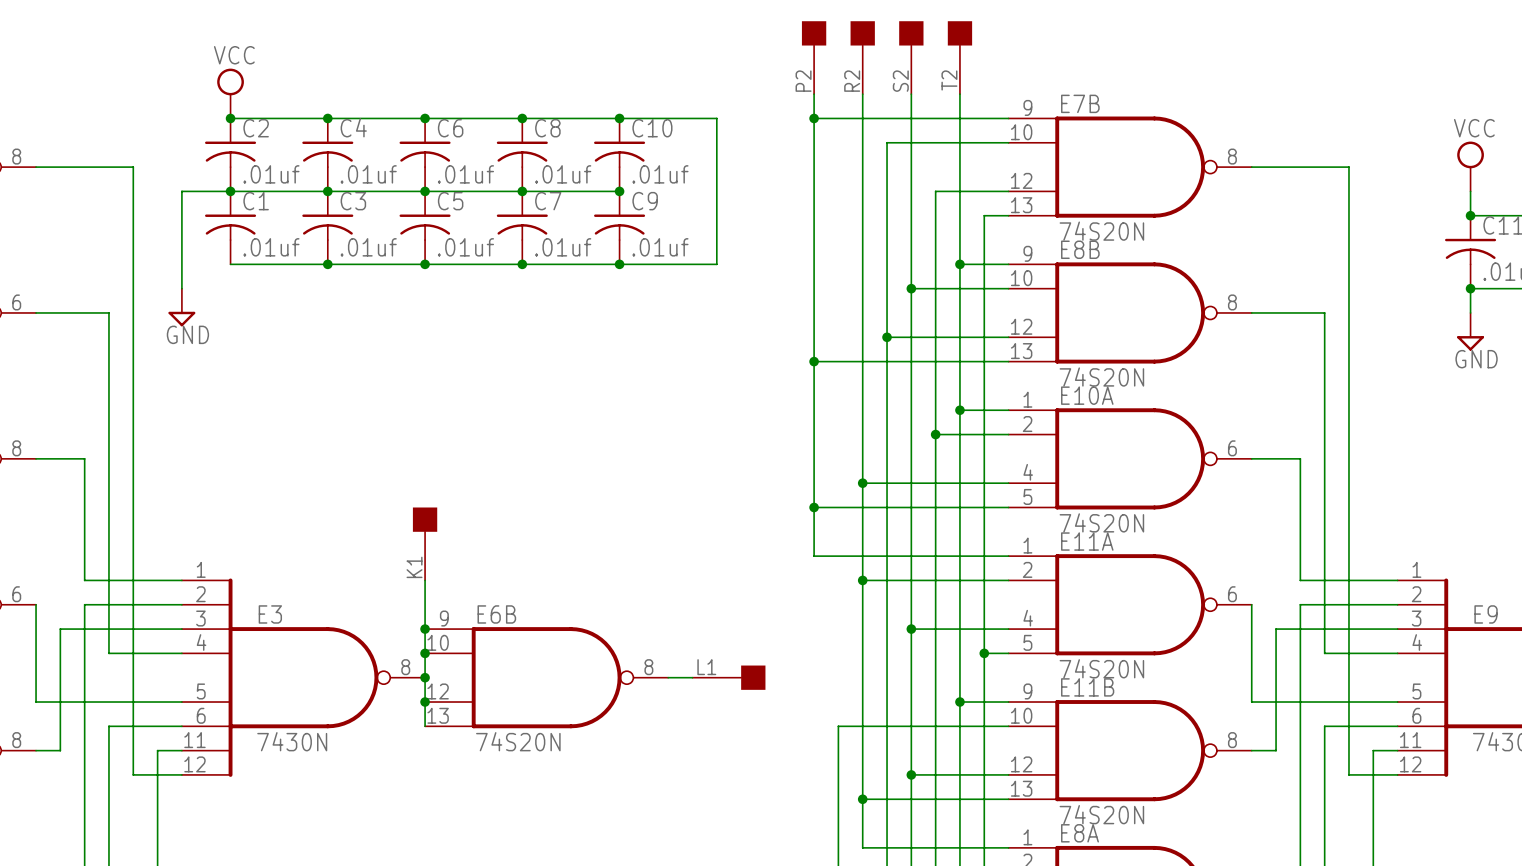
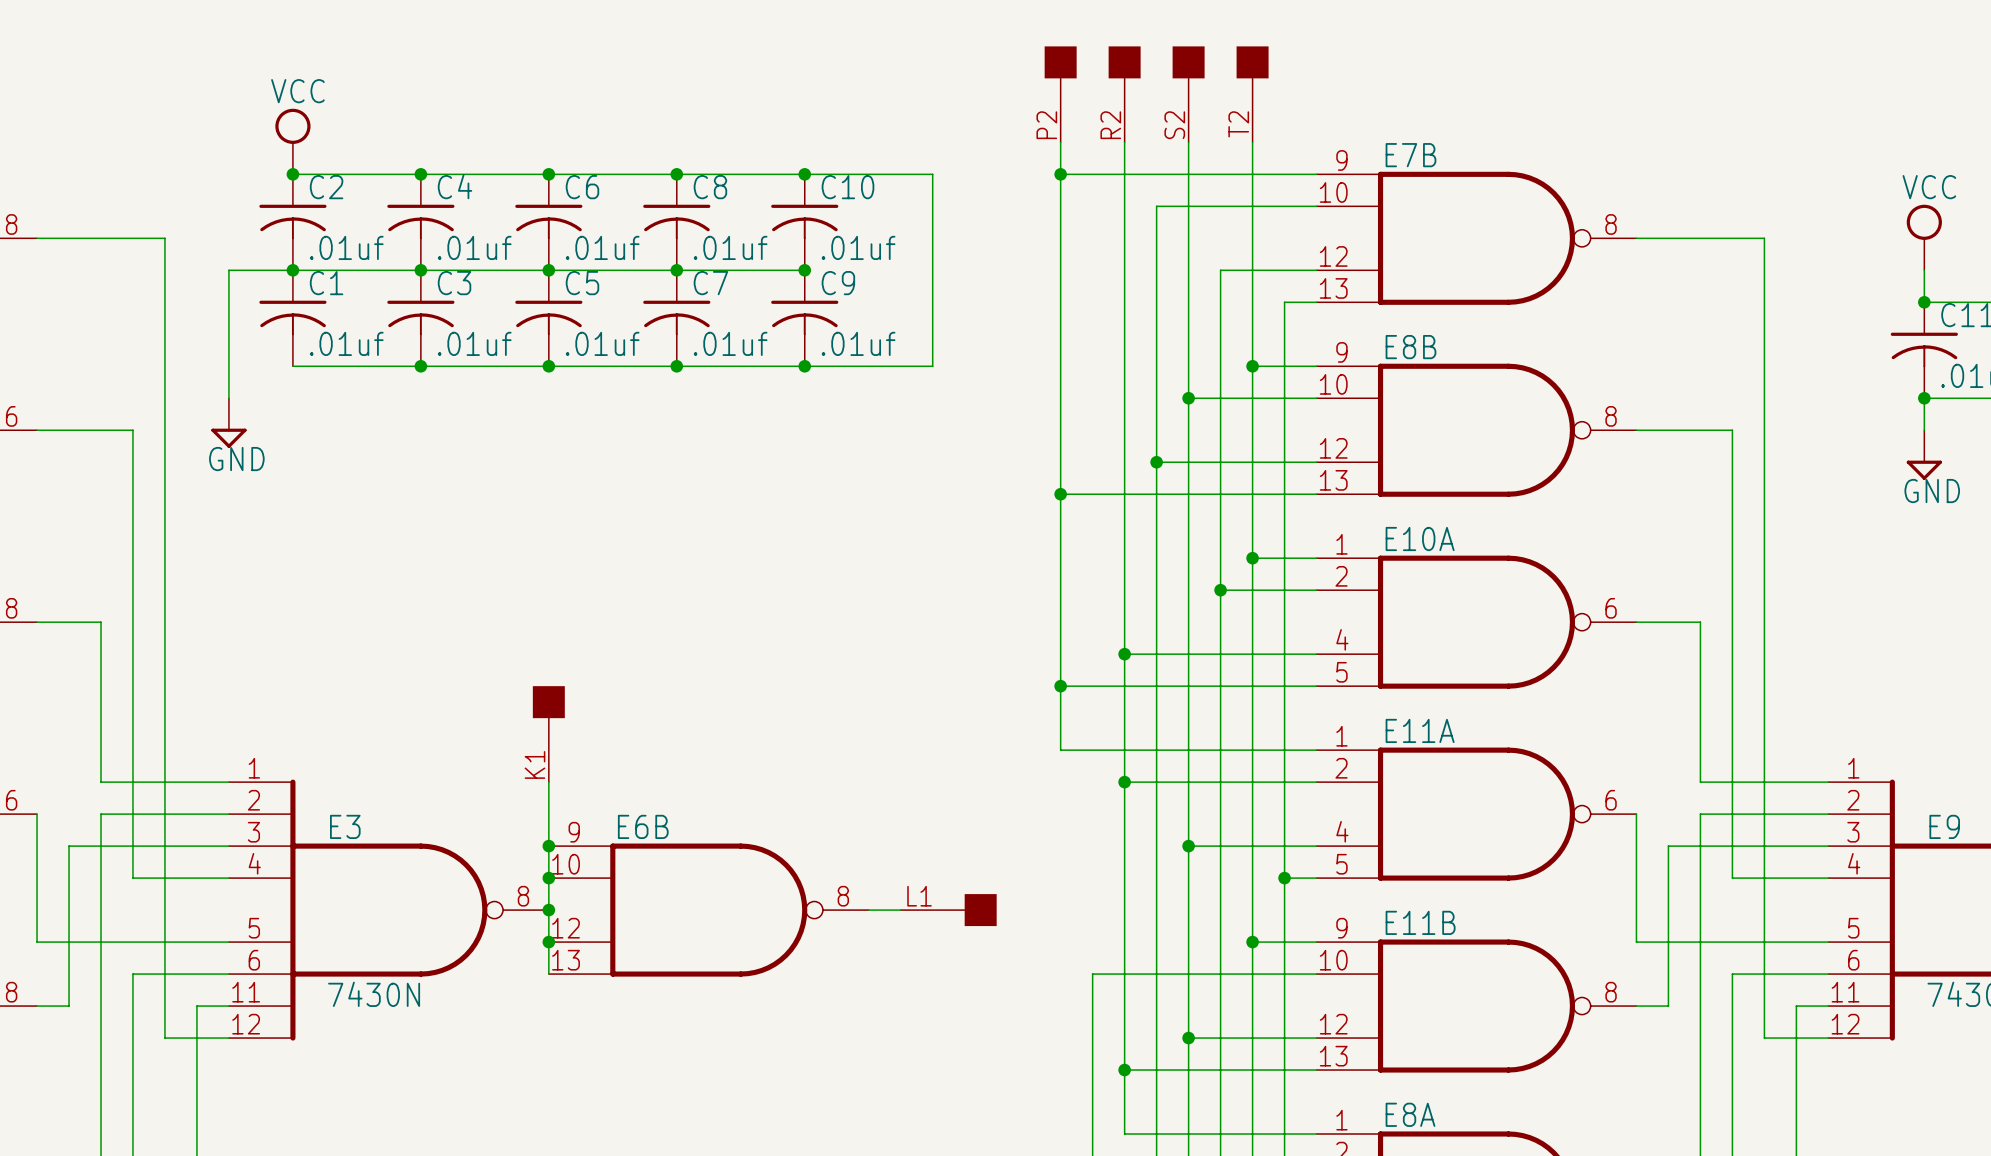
E7B value: 74S20N (1101, 231) -> none
E8B value: 74S20N (1101, 377) -> none
E10A value: 74S20N (1101, 522) -> none
E11A value: 74S20N (1101, 668) -> none
E6B value: 74S20N (518, 741) -> none
E11B value: 74S20N (1101, 814) -> none

